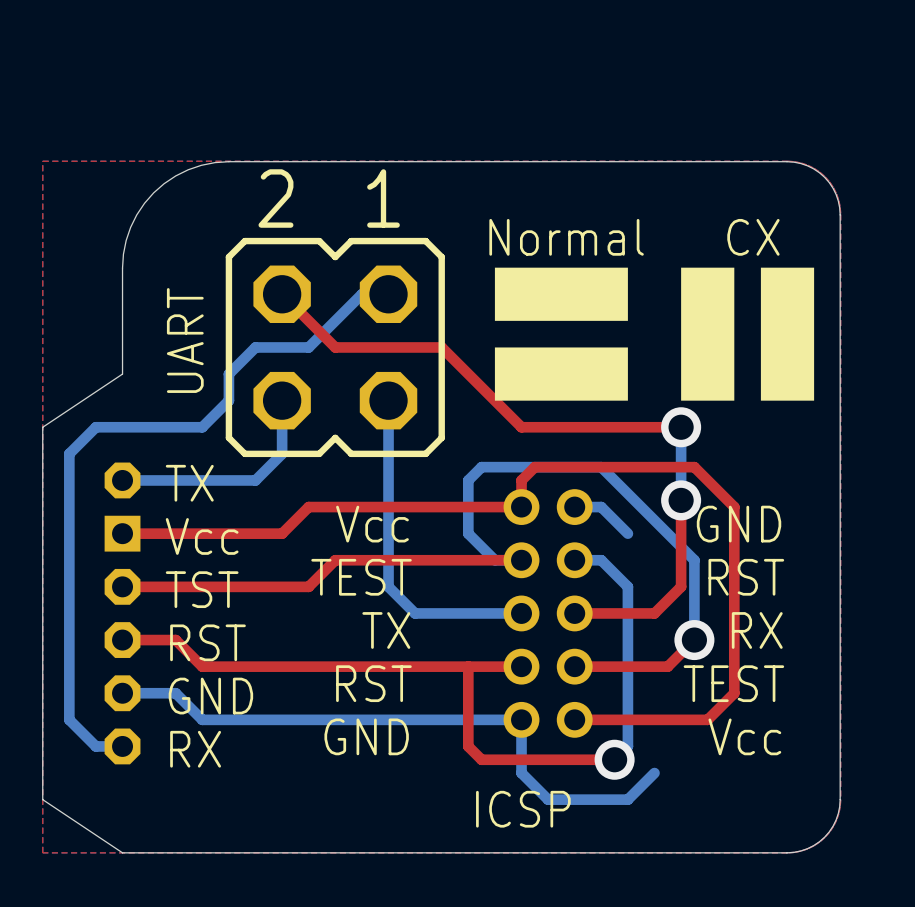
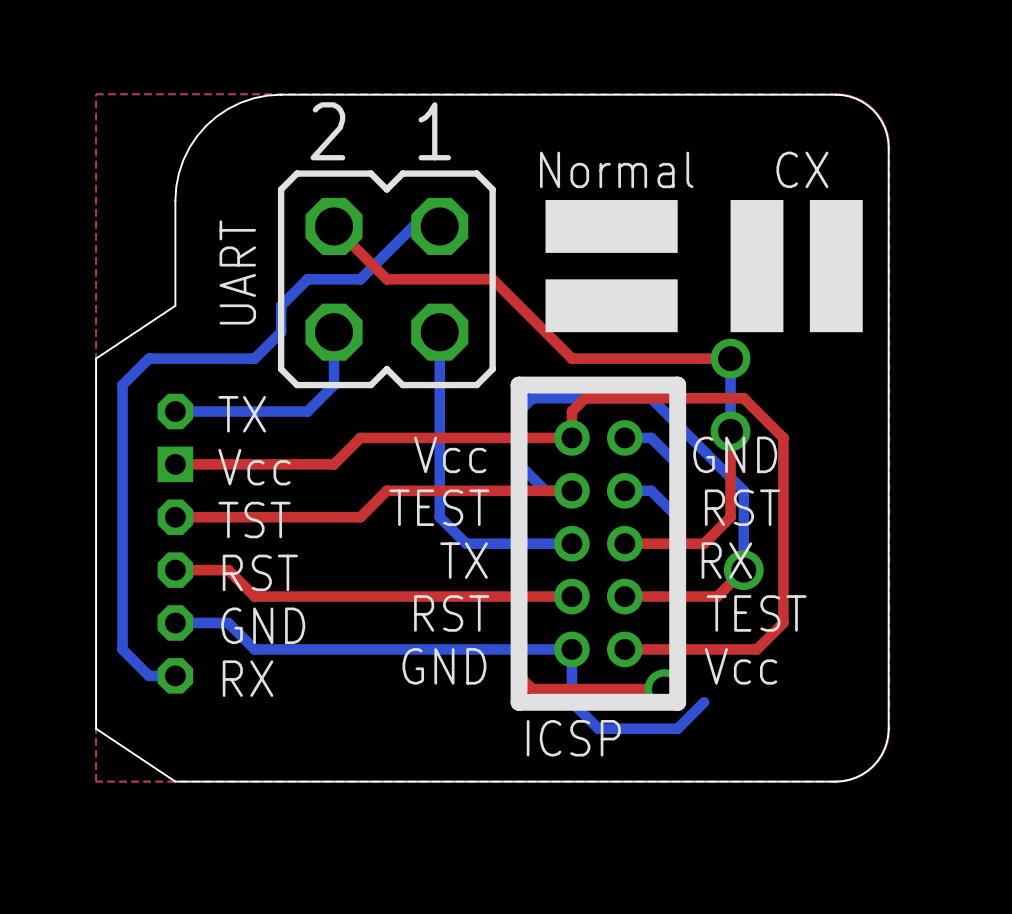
part footprint: [503, 489, 593, 738] -> [510, 376, 687, 711]

